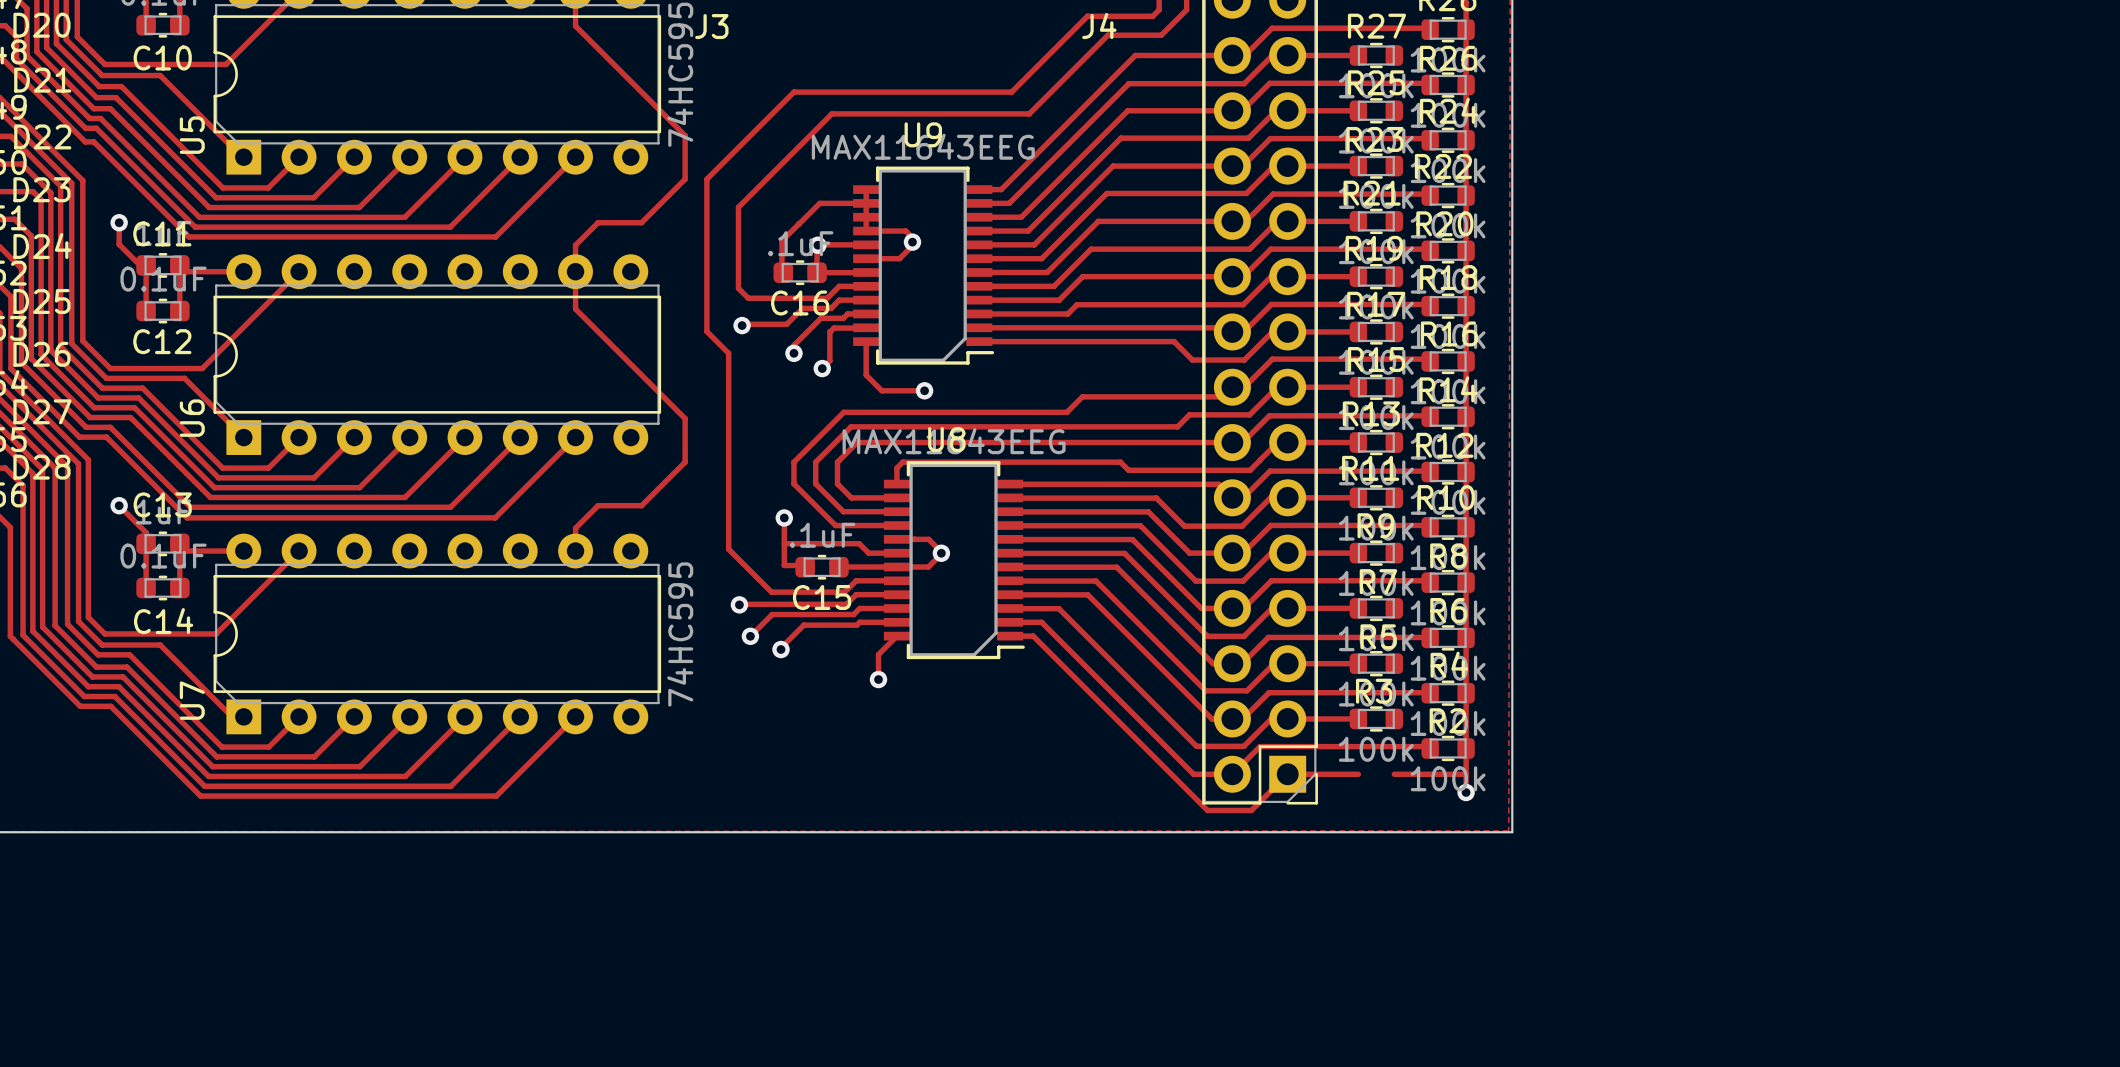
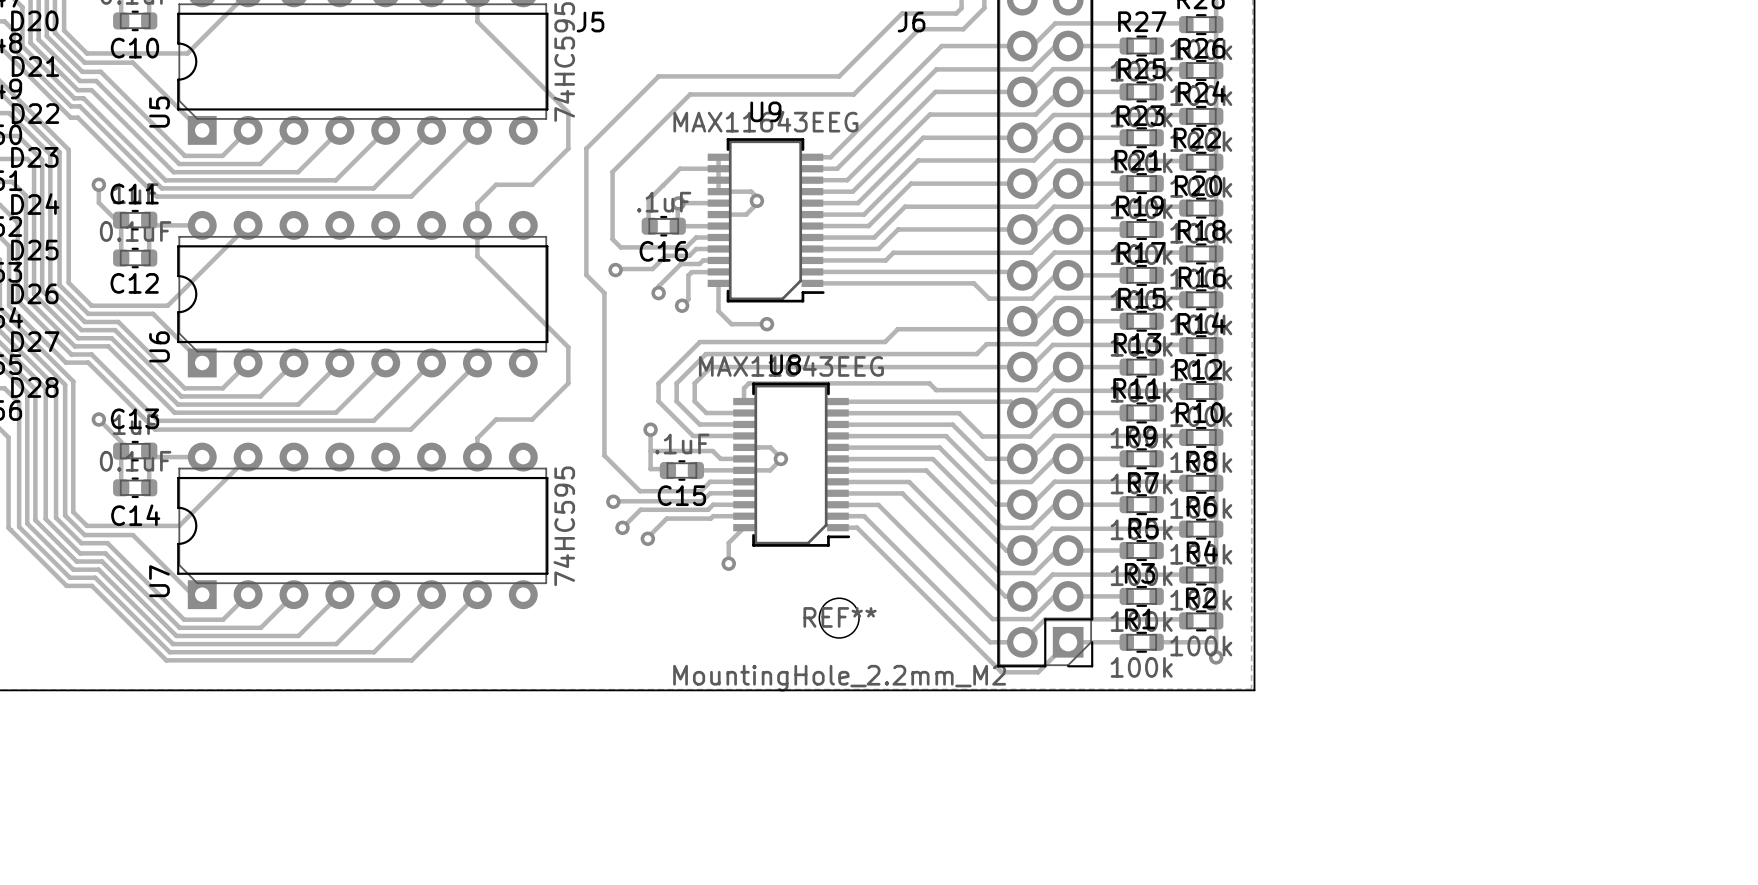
J3 name: J3 (711, 26) -> J5 (590, 22)
J4 name: J4 (1099, 26) -> J6 (911, 22)
REF**: none -> MountingHole_2.2mm_M2 (839, 618)
R1: none -> 100k (1141, 642)

